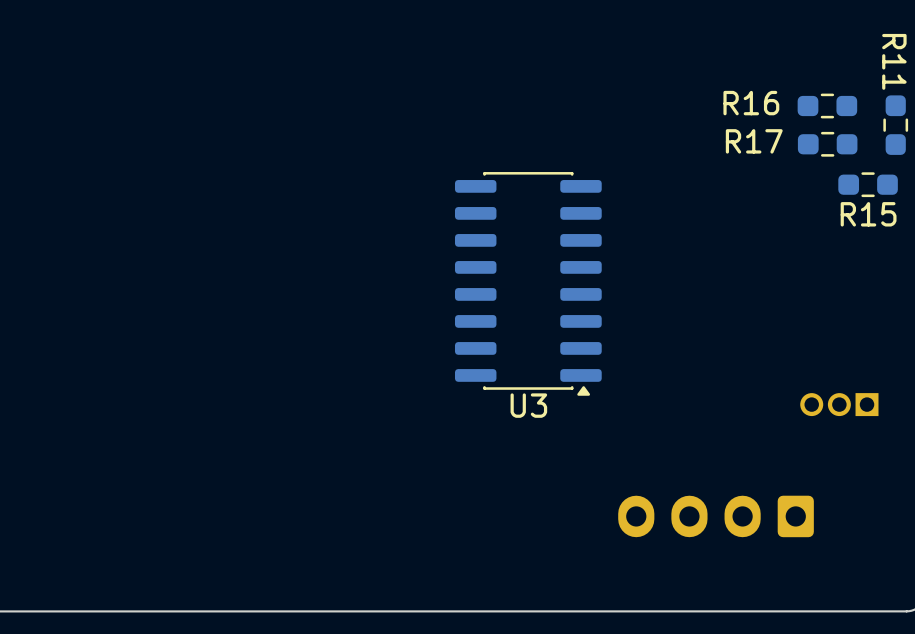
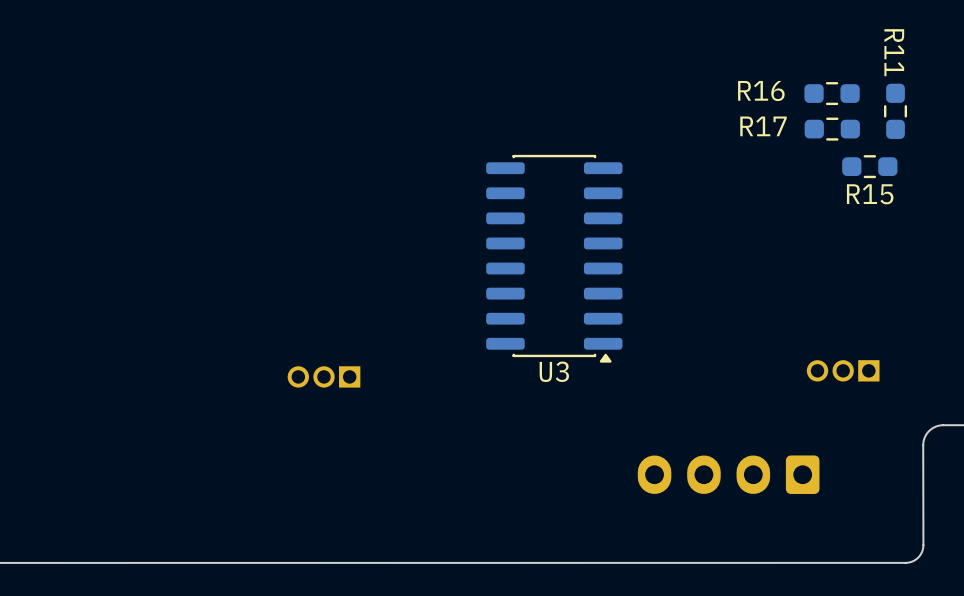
part: none -> (324, 376)

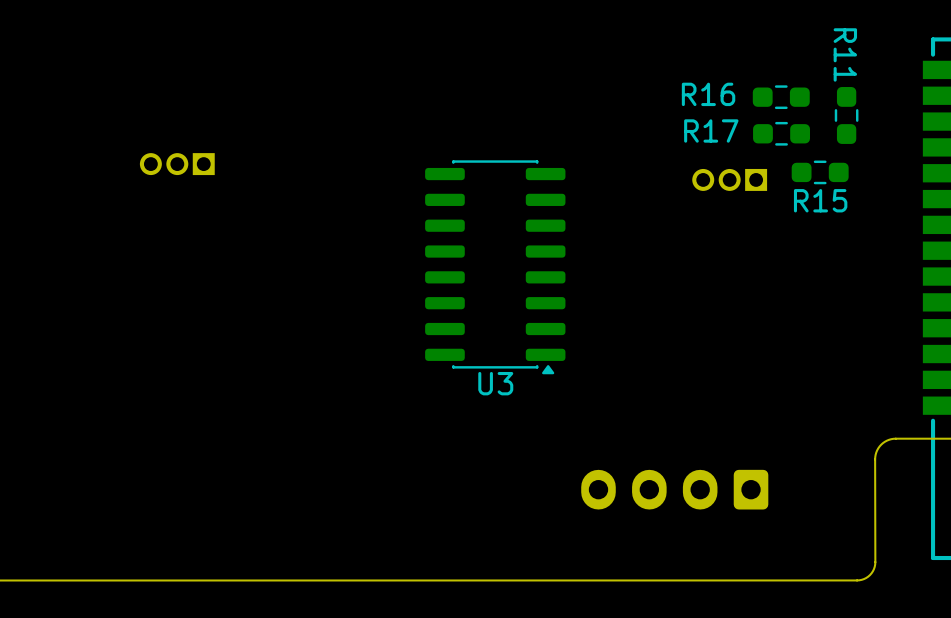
part position: (843, 370) -> (729, 179)
part position: (324, 376) -> (177, 164)

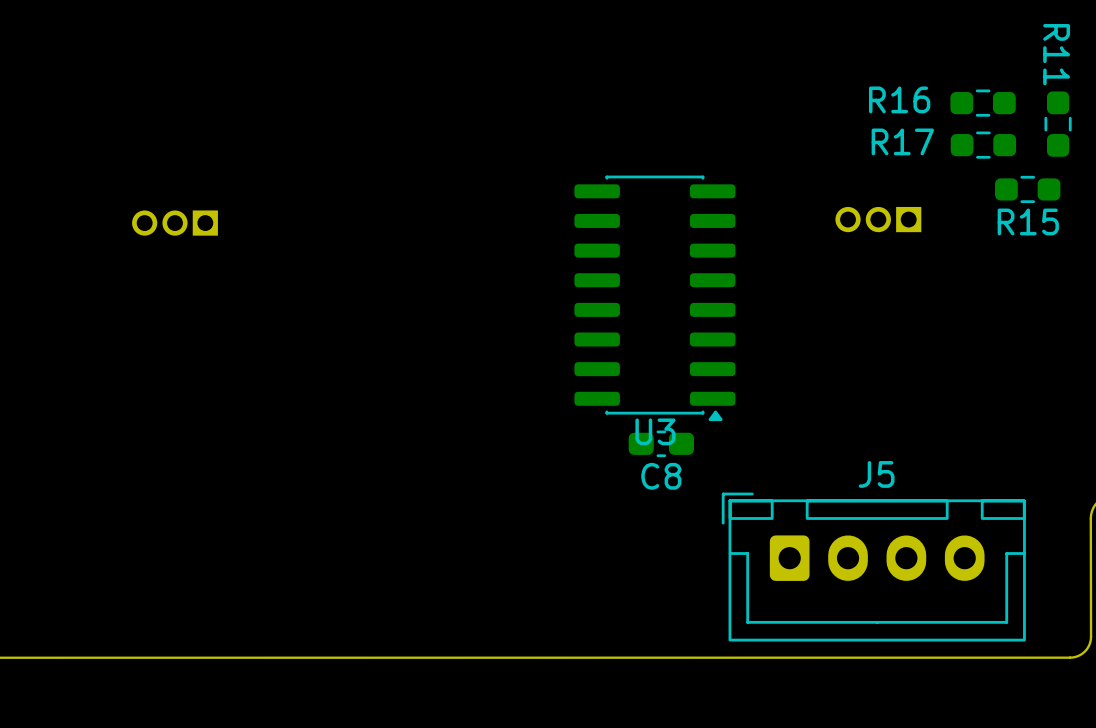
part position: (177, 164) -> (175, 223)
part position: (729, 179) -> (878, 219)
C8: none -> (661, 443)
J5 side: top (674, 489) -> bottom (873, 567)

